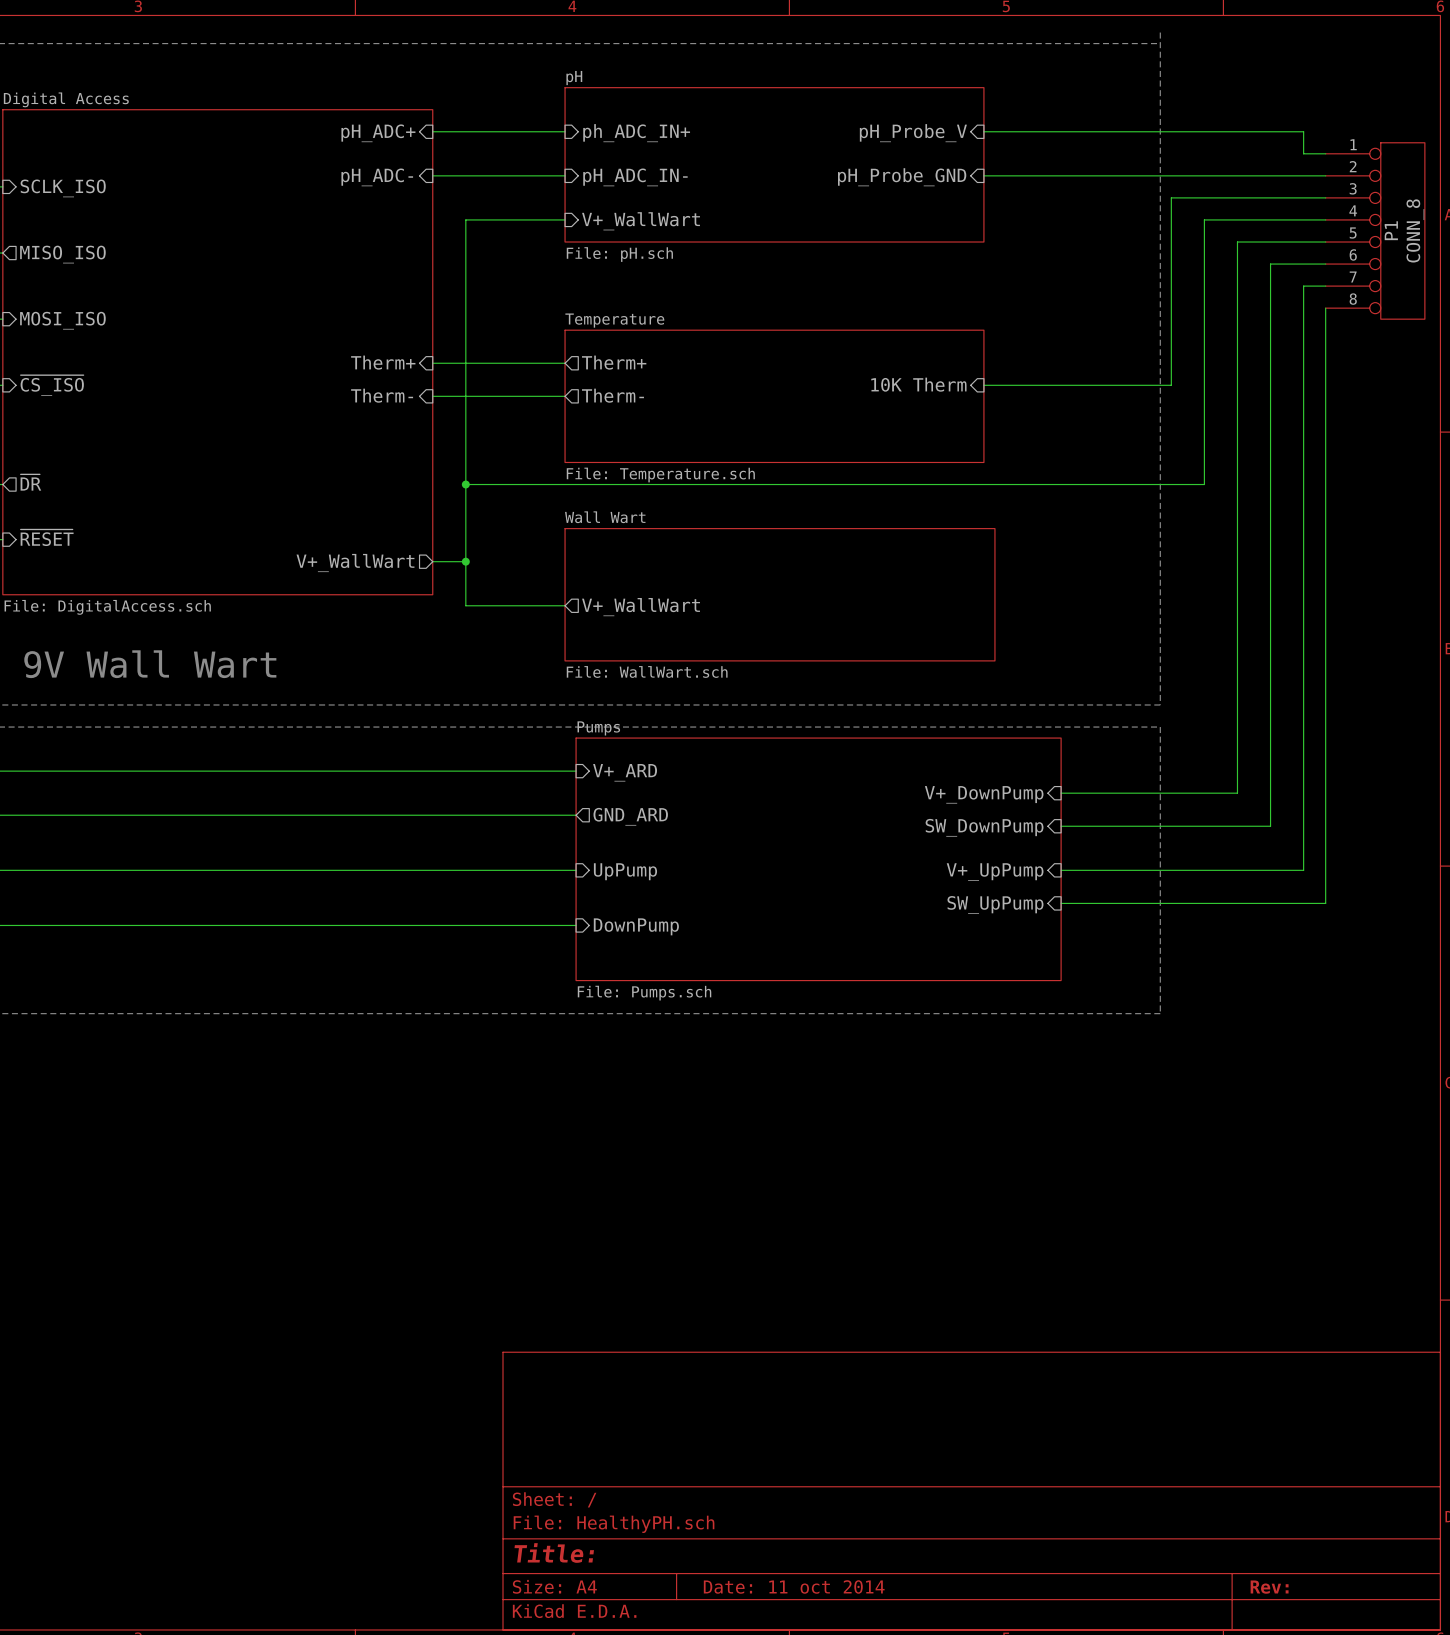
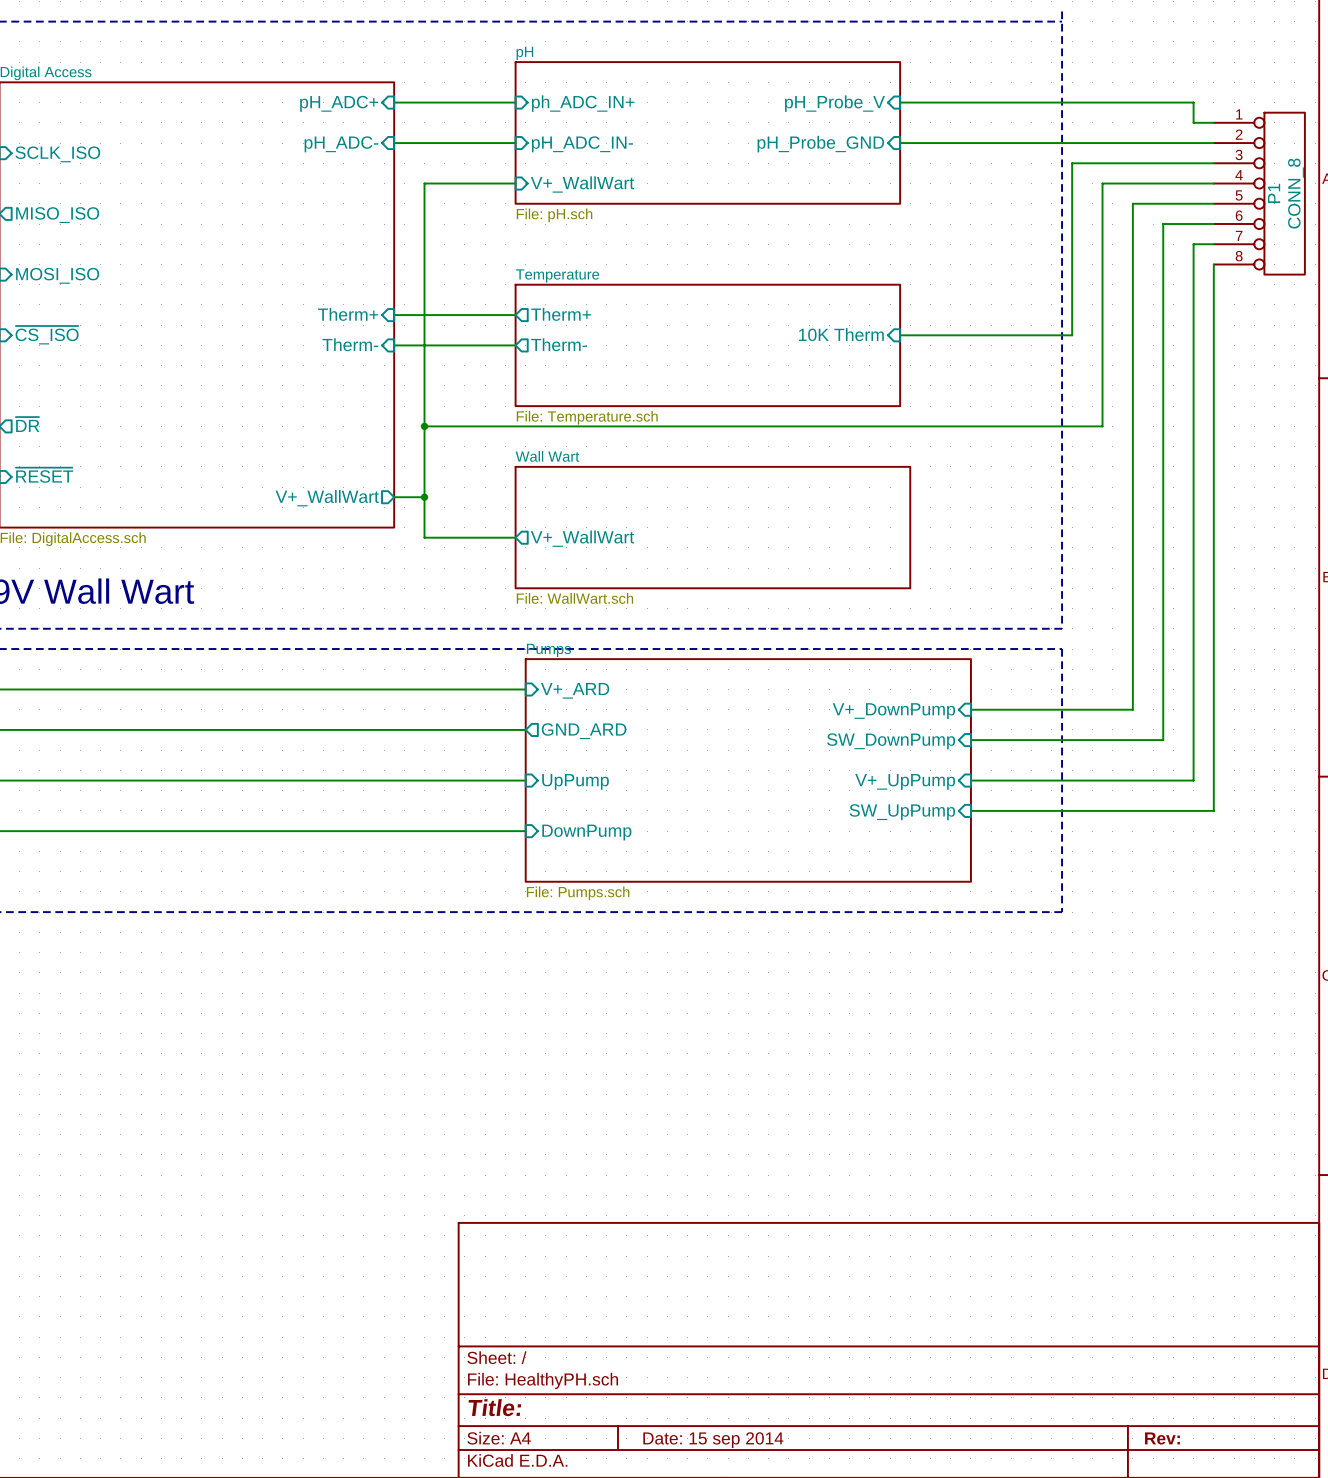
title block: Date: 11 oct 2014 (794, 1586) -> Date: 15 sep 2014 (713, 1440)

